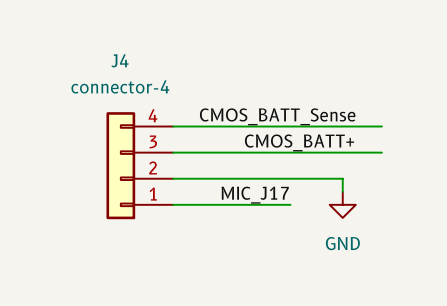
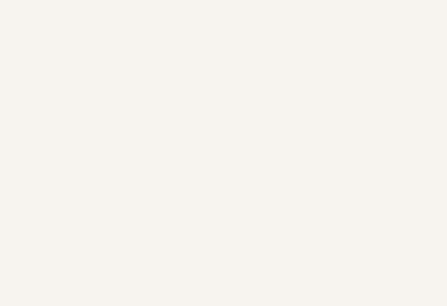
label: CMOS_BATT_Sense (277, 116) -> none
wire: (173, 126) (381, 126) -> none
label: CMOS_BATT+ (299, 142) -> none
wire: (173, 152) (381, 152) -> none
J4: connector-4 (139, 165) -> none
wire: (173, 178) (342, 178) (342, 191) -> none
label: MIC_J17 (255, 195) -> none
wire: (173, 204) (290, 204) -> none
power symbol: GND (342, 204) -> none

